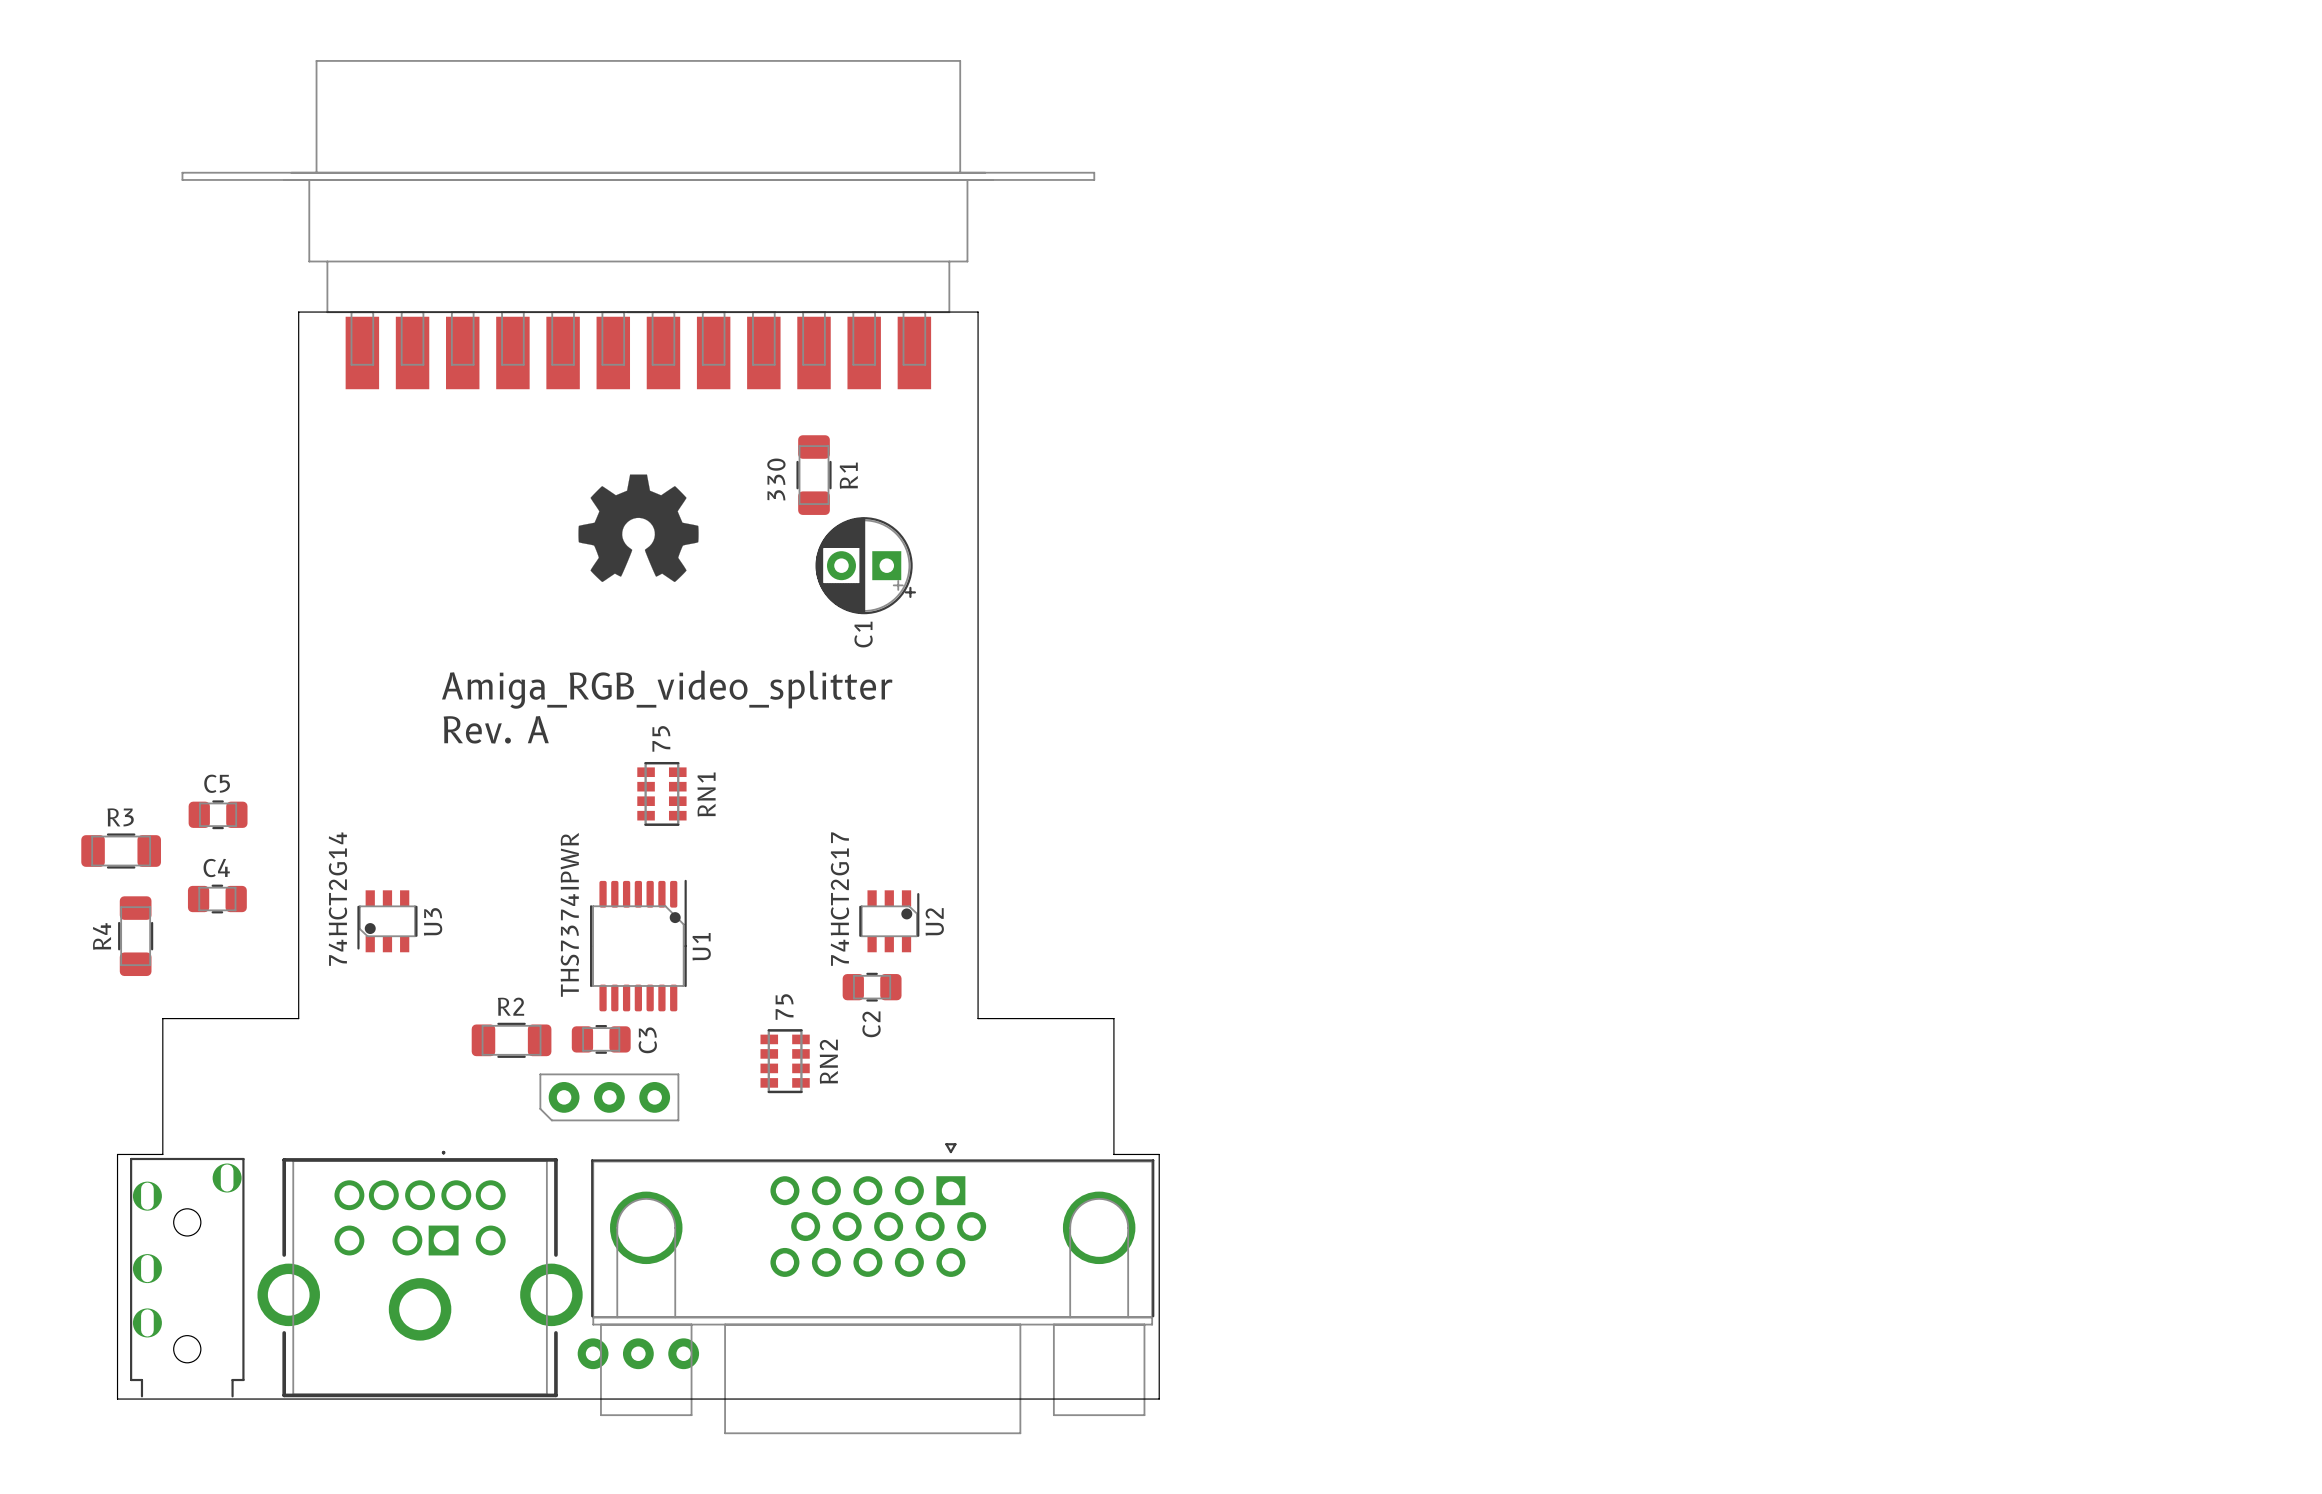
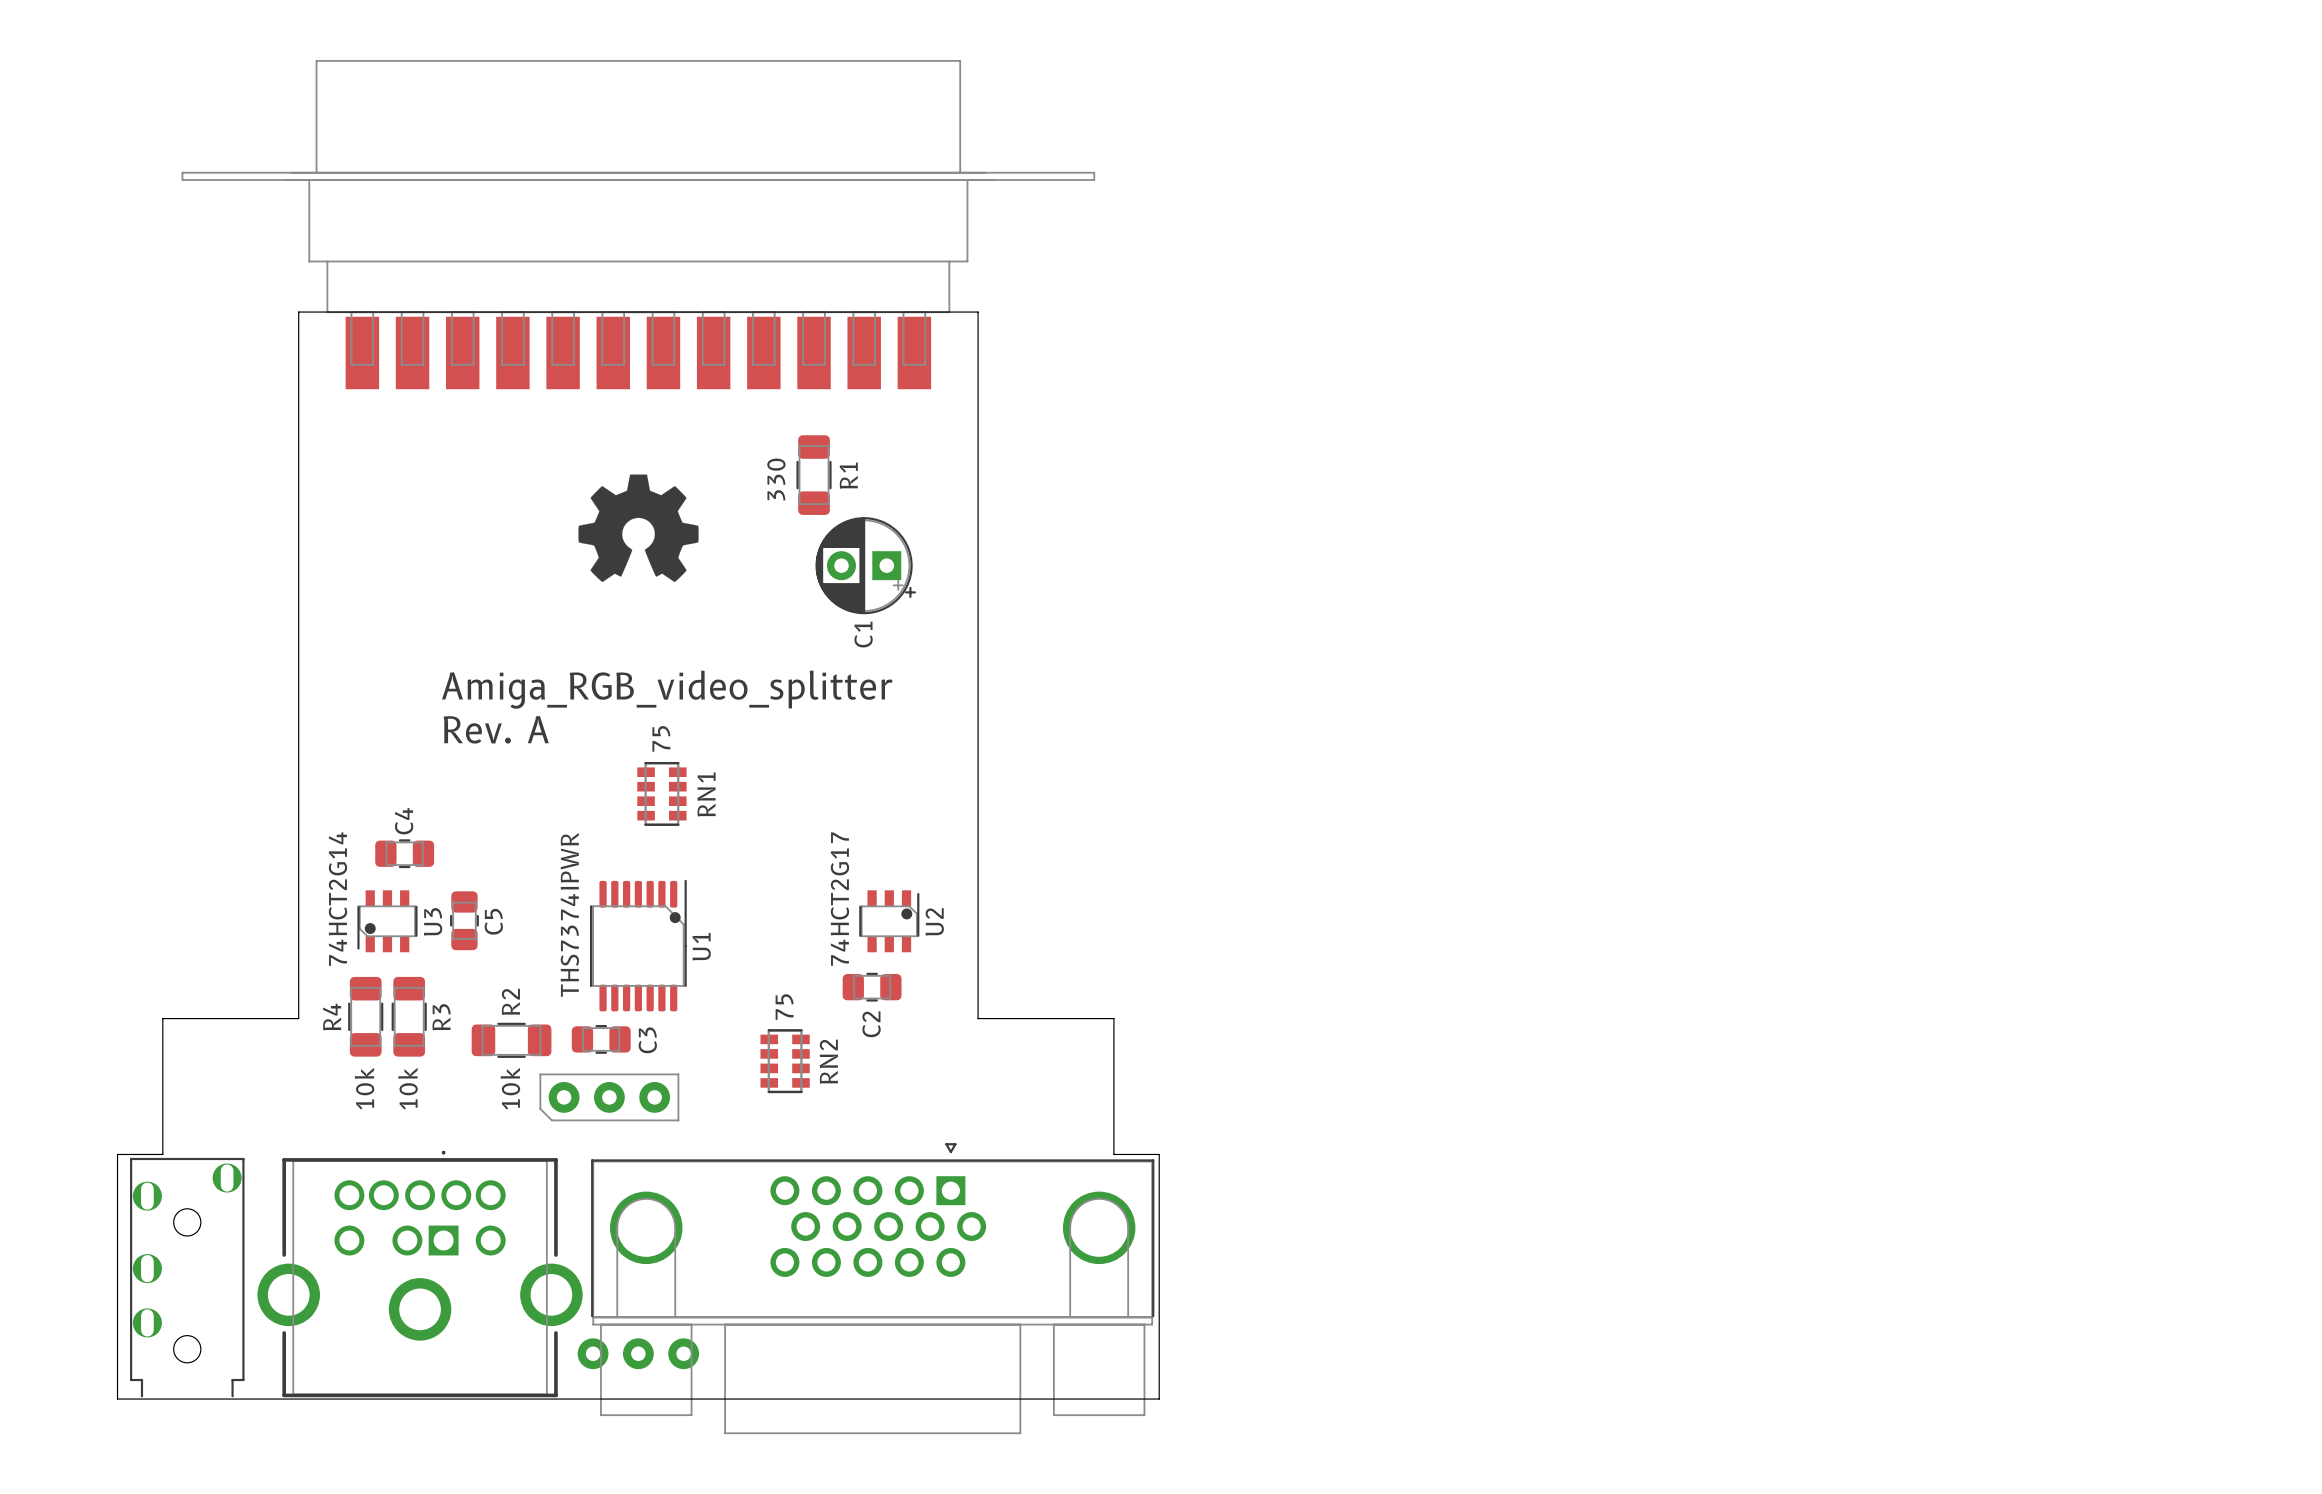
C5 rotation: 0° (218, 814) -> 90° clockwise (464, 920)
C5 position: (218, 814) -> (464, 920)
R3 rotation: 0° (121, 851) -> 90° clockwise (409, 1016)
R3 position: (121, 851) -> (409, 1016)
C4 name rotation: 0° (216, 868) -> 90° counterclockwise (404, 821)
C4 position: (217, 899) -> (404, 853)
R4 position: (135, 936) -> (365, 1016)
R2 name rotation: 0° (511, 1006) -> 90° counterclockwise (510, 1001)
text: none -> 10k (364, 1088)
text: none -> 10k (408, 1088)
text: none -> 10k (510, 1088)

